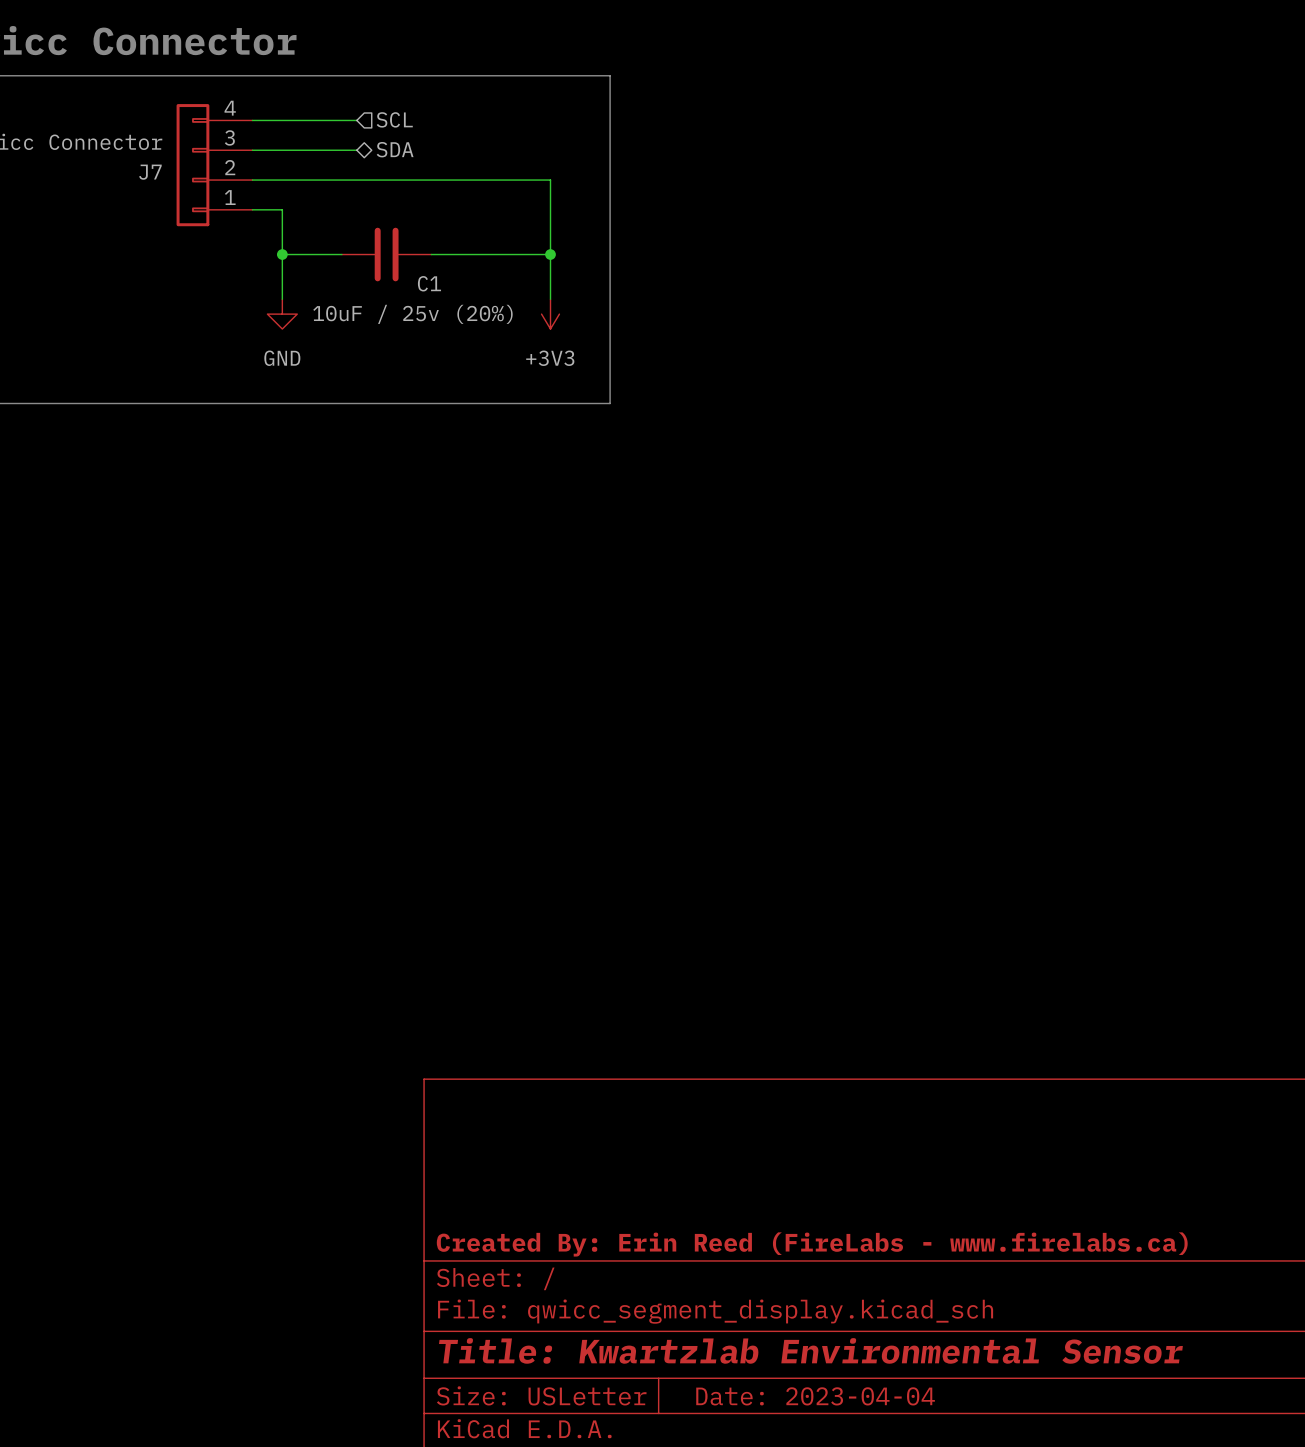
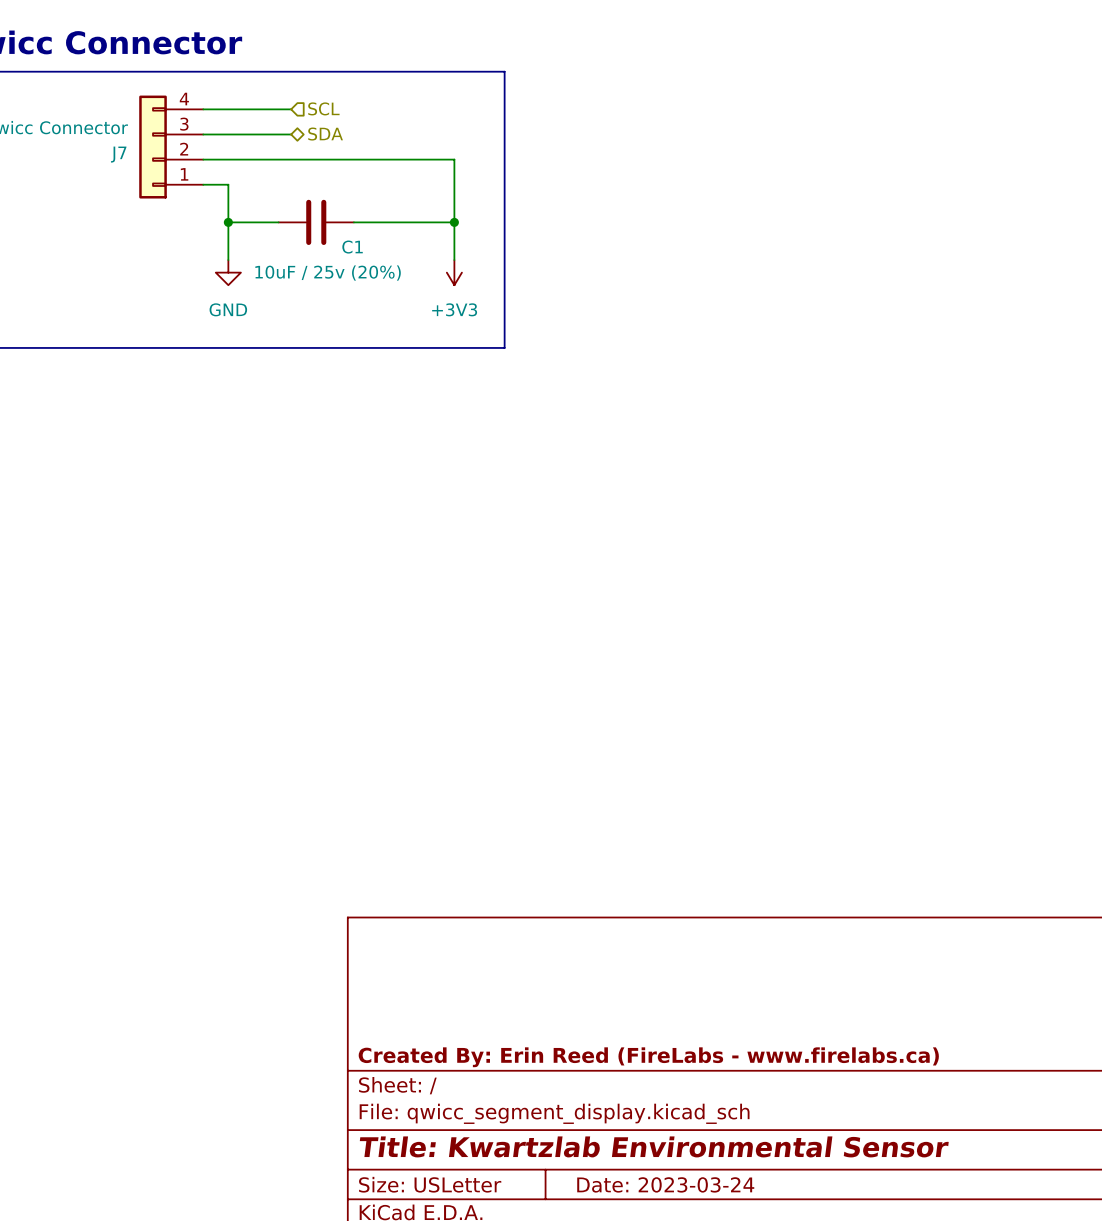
title block: Date: 2023-04-04 (815, 1396) -> Date: 2023-03-24 (665, 1184)

